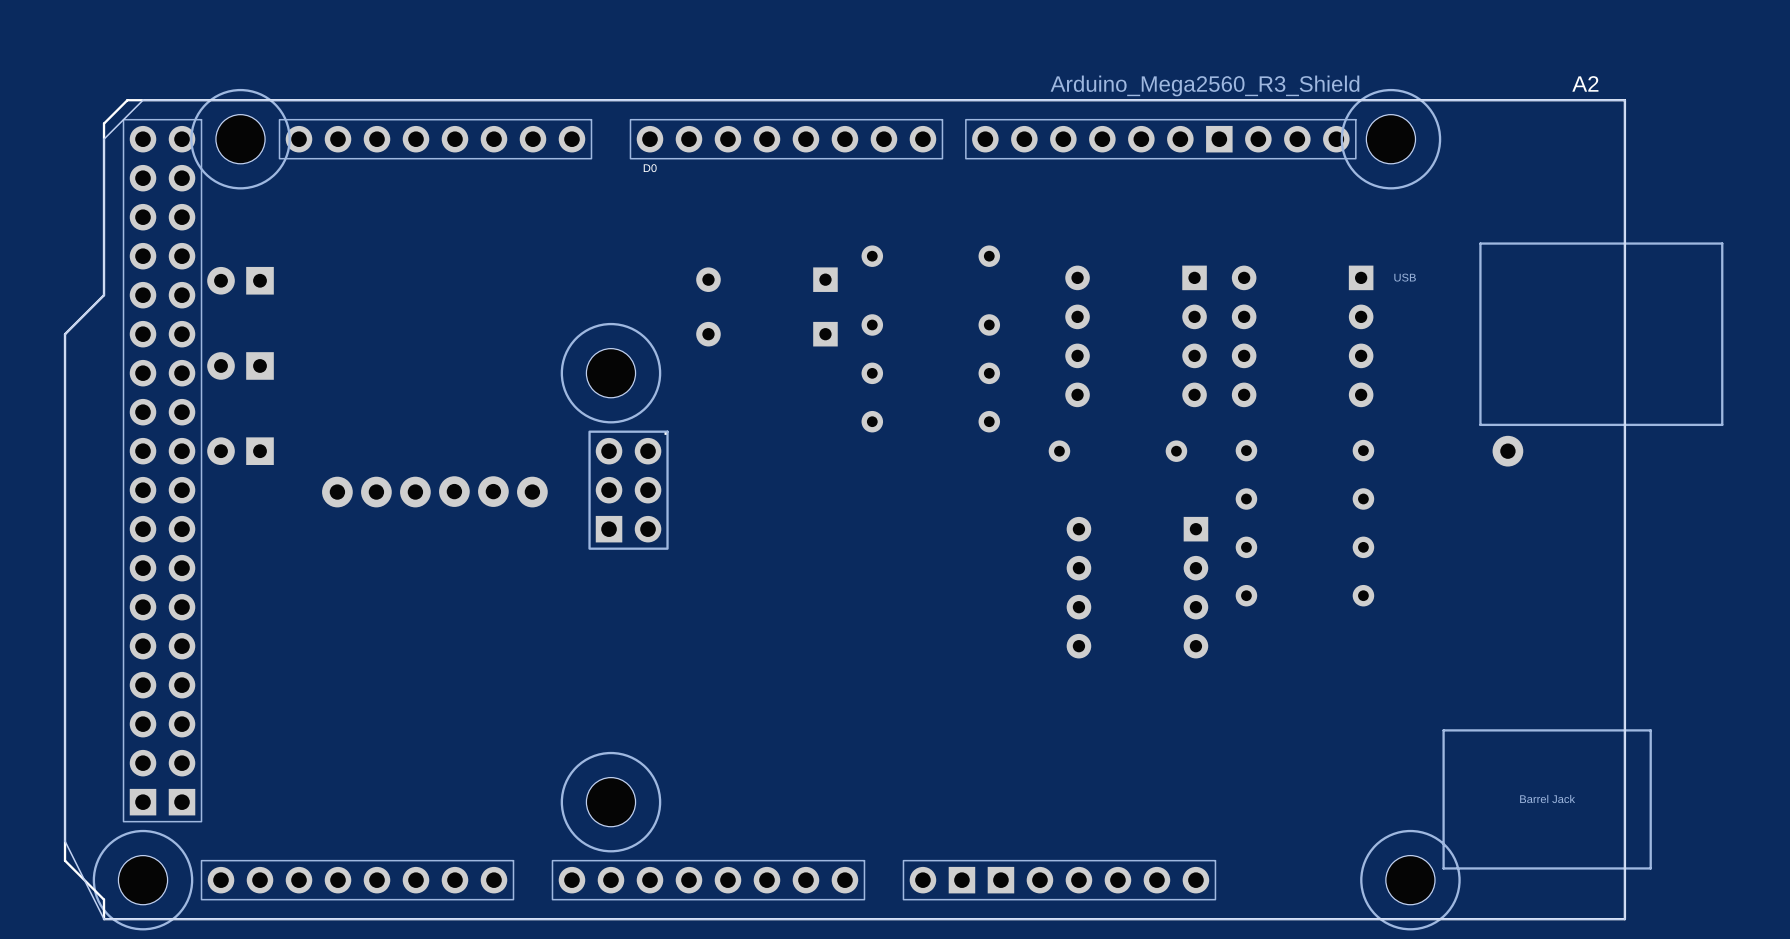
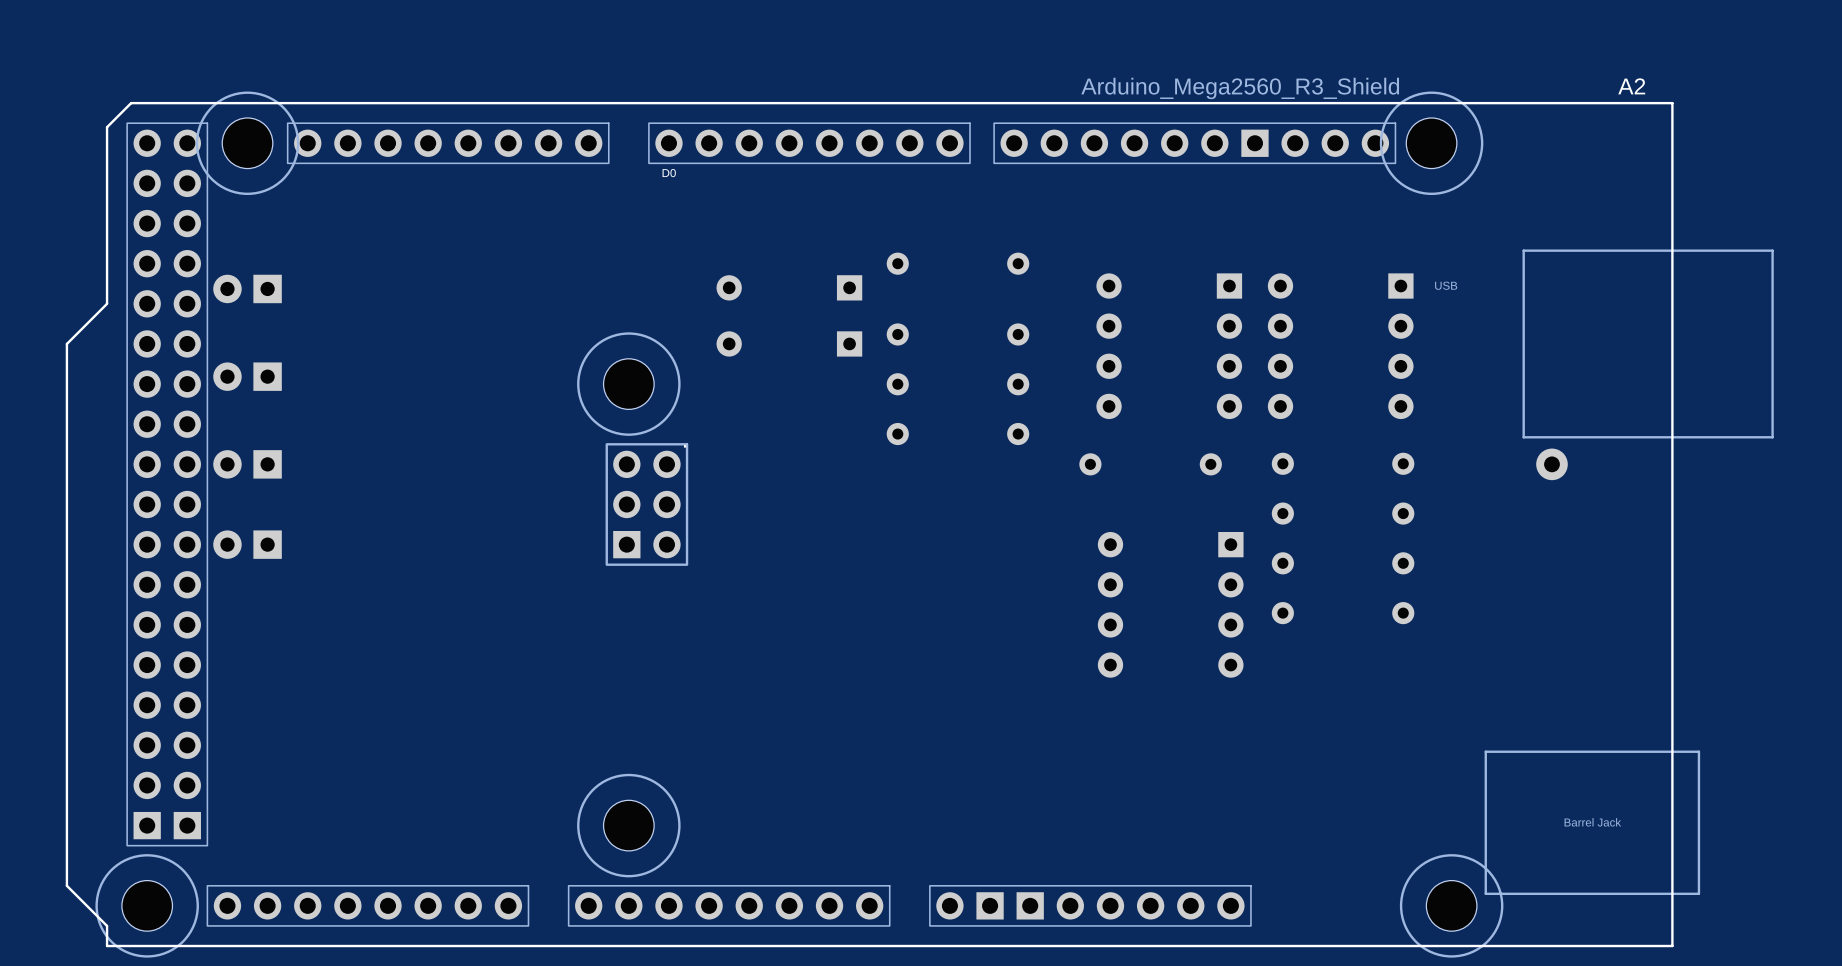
board edge: (1624, 100) (1624, 919) (104, 919) (65, 841) (65, 334) (104, 295) (104, 139) (143, 100) (1624, 100) -> none
part: (454, 491) -> none
part: (493, 491) -> none
part: (337, 492) -> none
part: (376, 492) -> none
part: (415, 492) -> none
part: (532, 492) -> none
part: none -> (247, 544)

